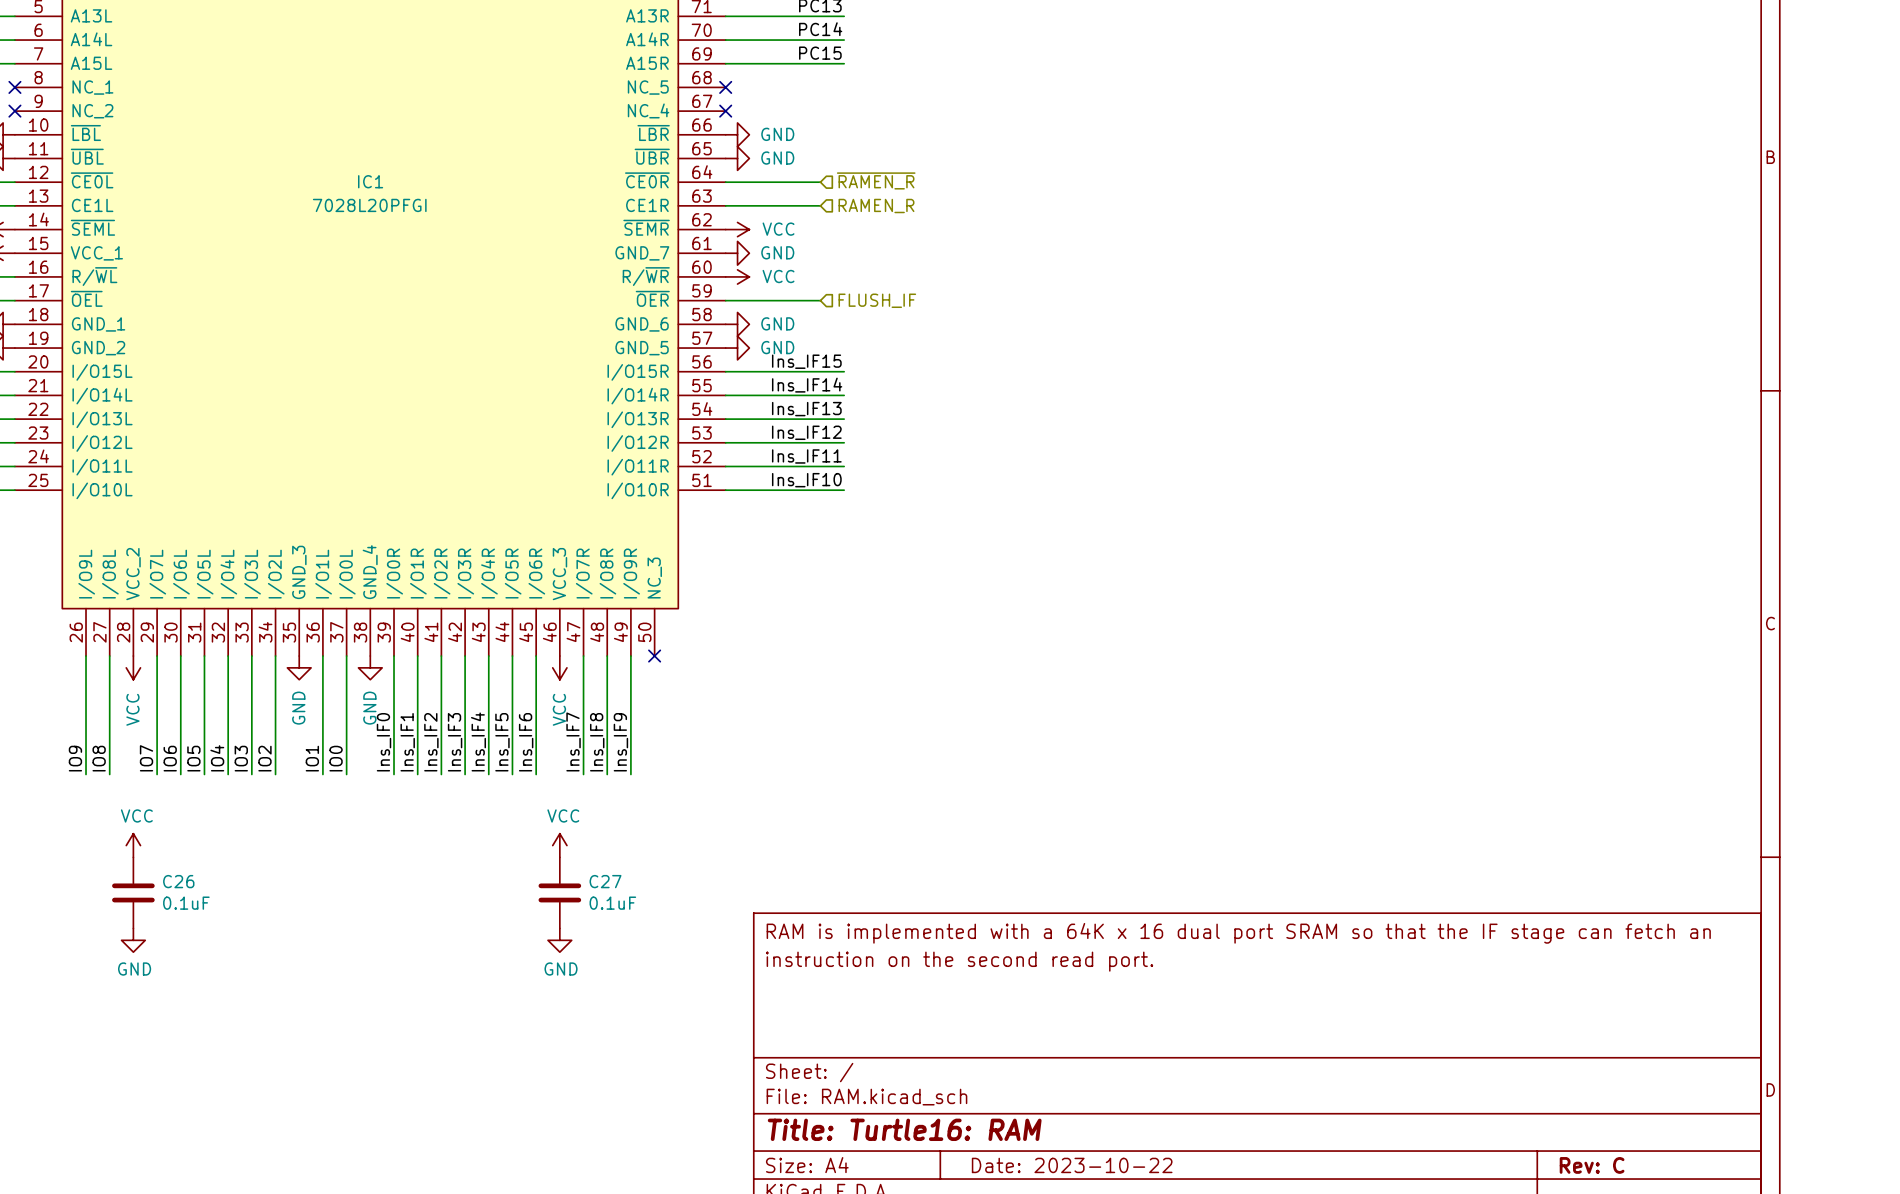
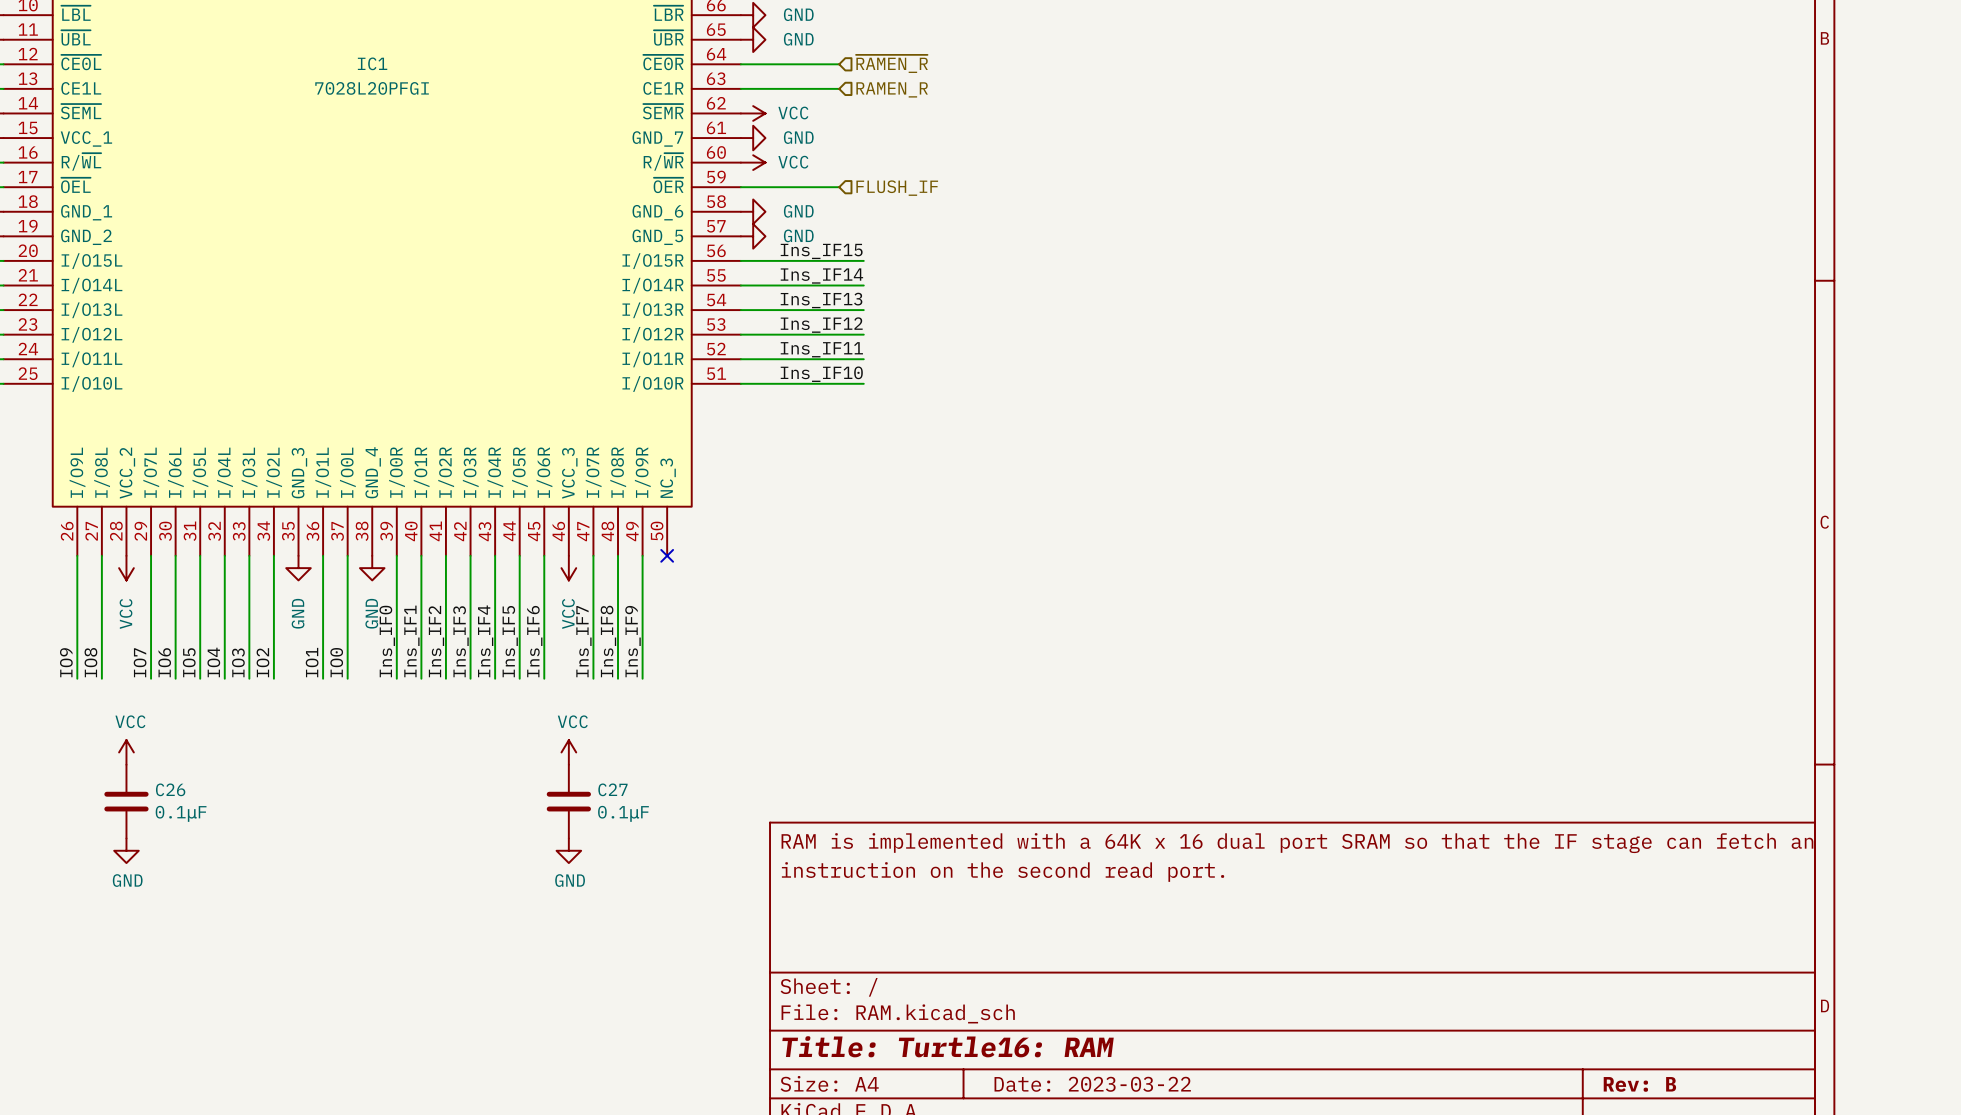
C26 value: 0.1uF (186, 903) -> 0.1μF (181, 813)
C27 value: 0.1uF (612, 903) -> 0.1μF (623, 813)
title block: Date: 2023-10-22 (1072, 1165) -> Date: 2023-03-22 (1092, 1084)
title block: Rev: C (1592, 1165) -> Rev: B (1639, 1084)

